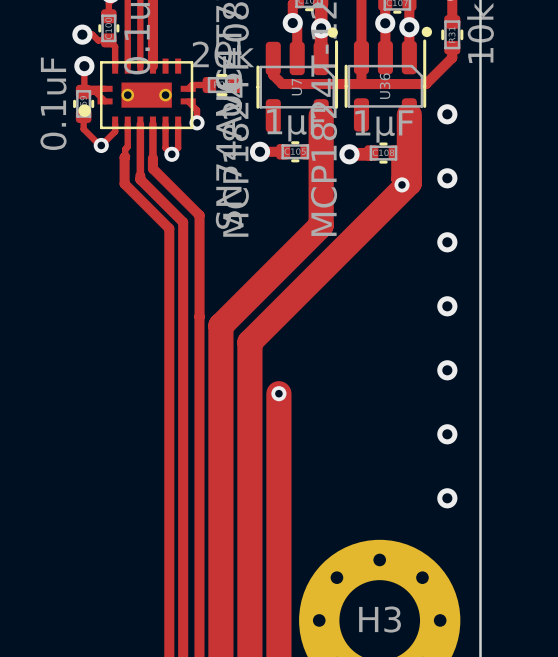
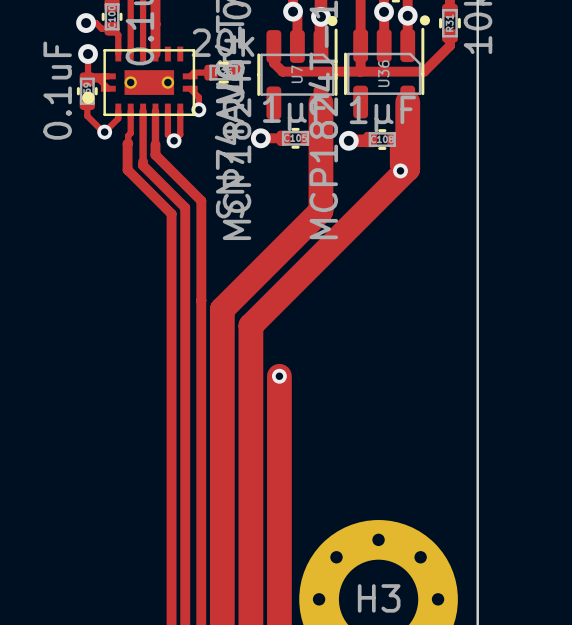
via: (447, 114) -> none
via: (447, 178) -> none
via: (447, 242) -> none
via: (447, 306) -> none
via: (447, 370) -> none
via: (447, 434) -> none
via: (447, 498) -> none

